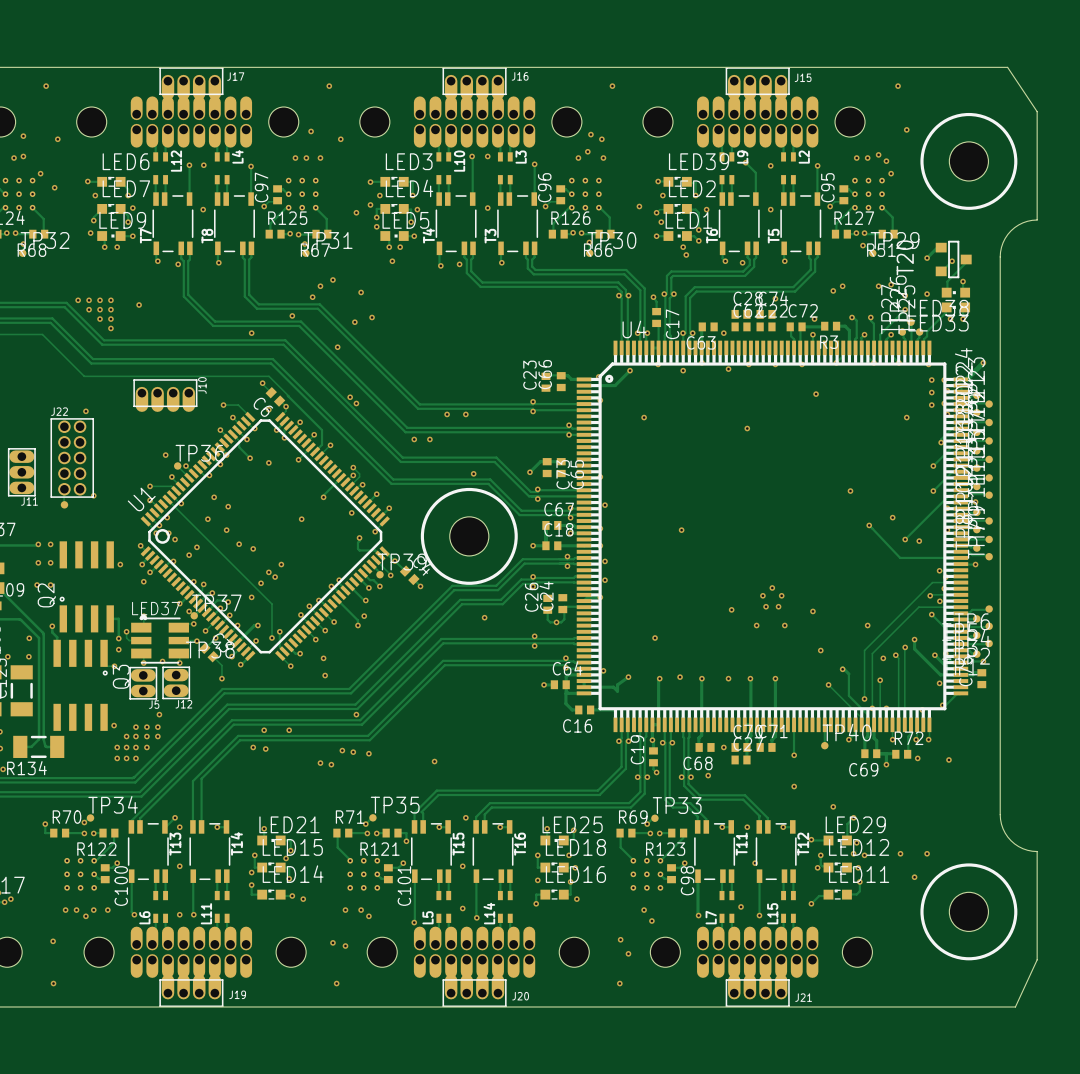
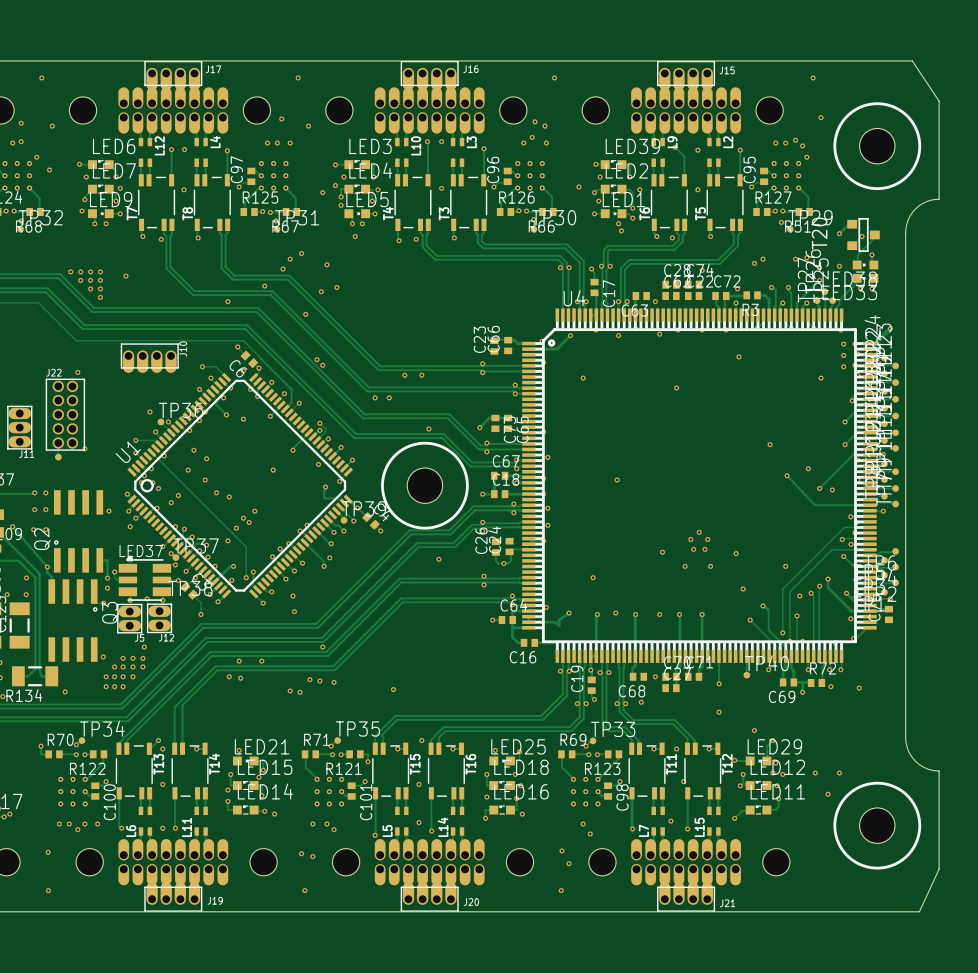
track: none -> (12, 526) (47, 567)
via: none -> (12, 526)
via: none -> (65, 691)

